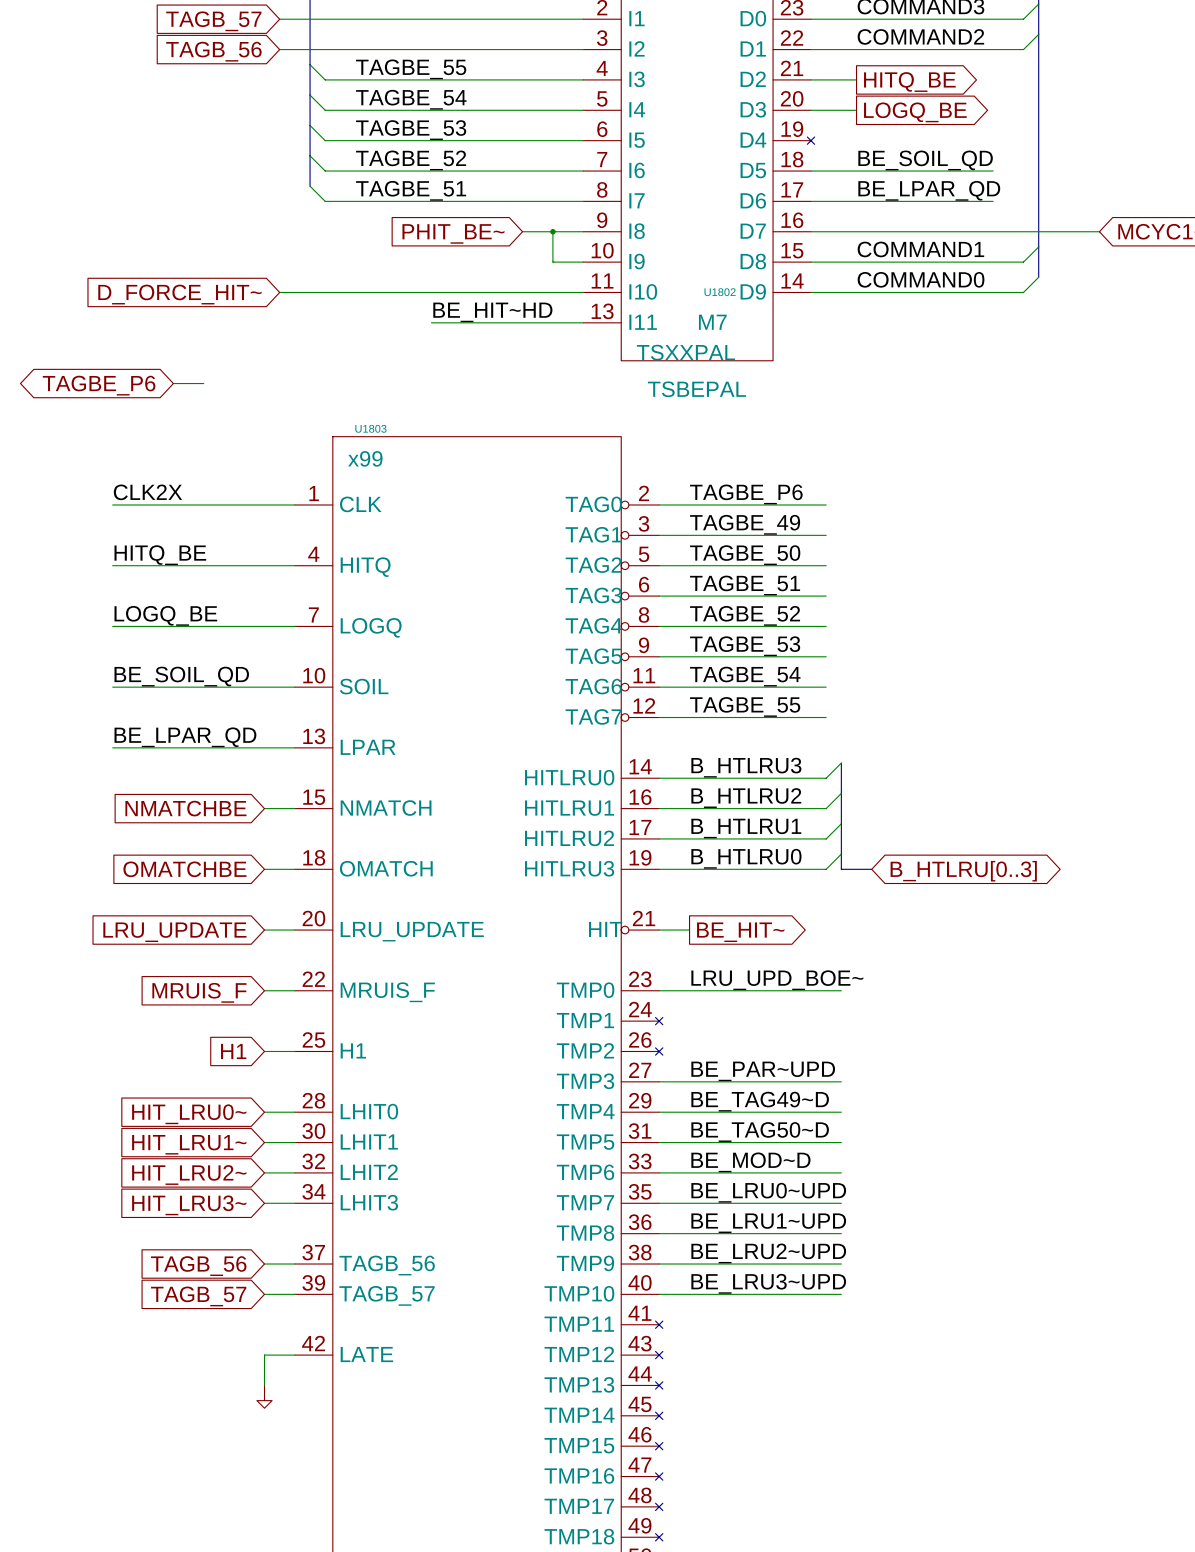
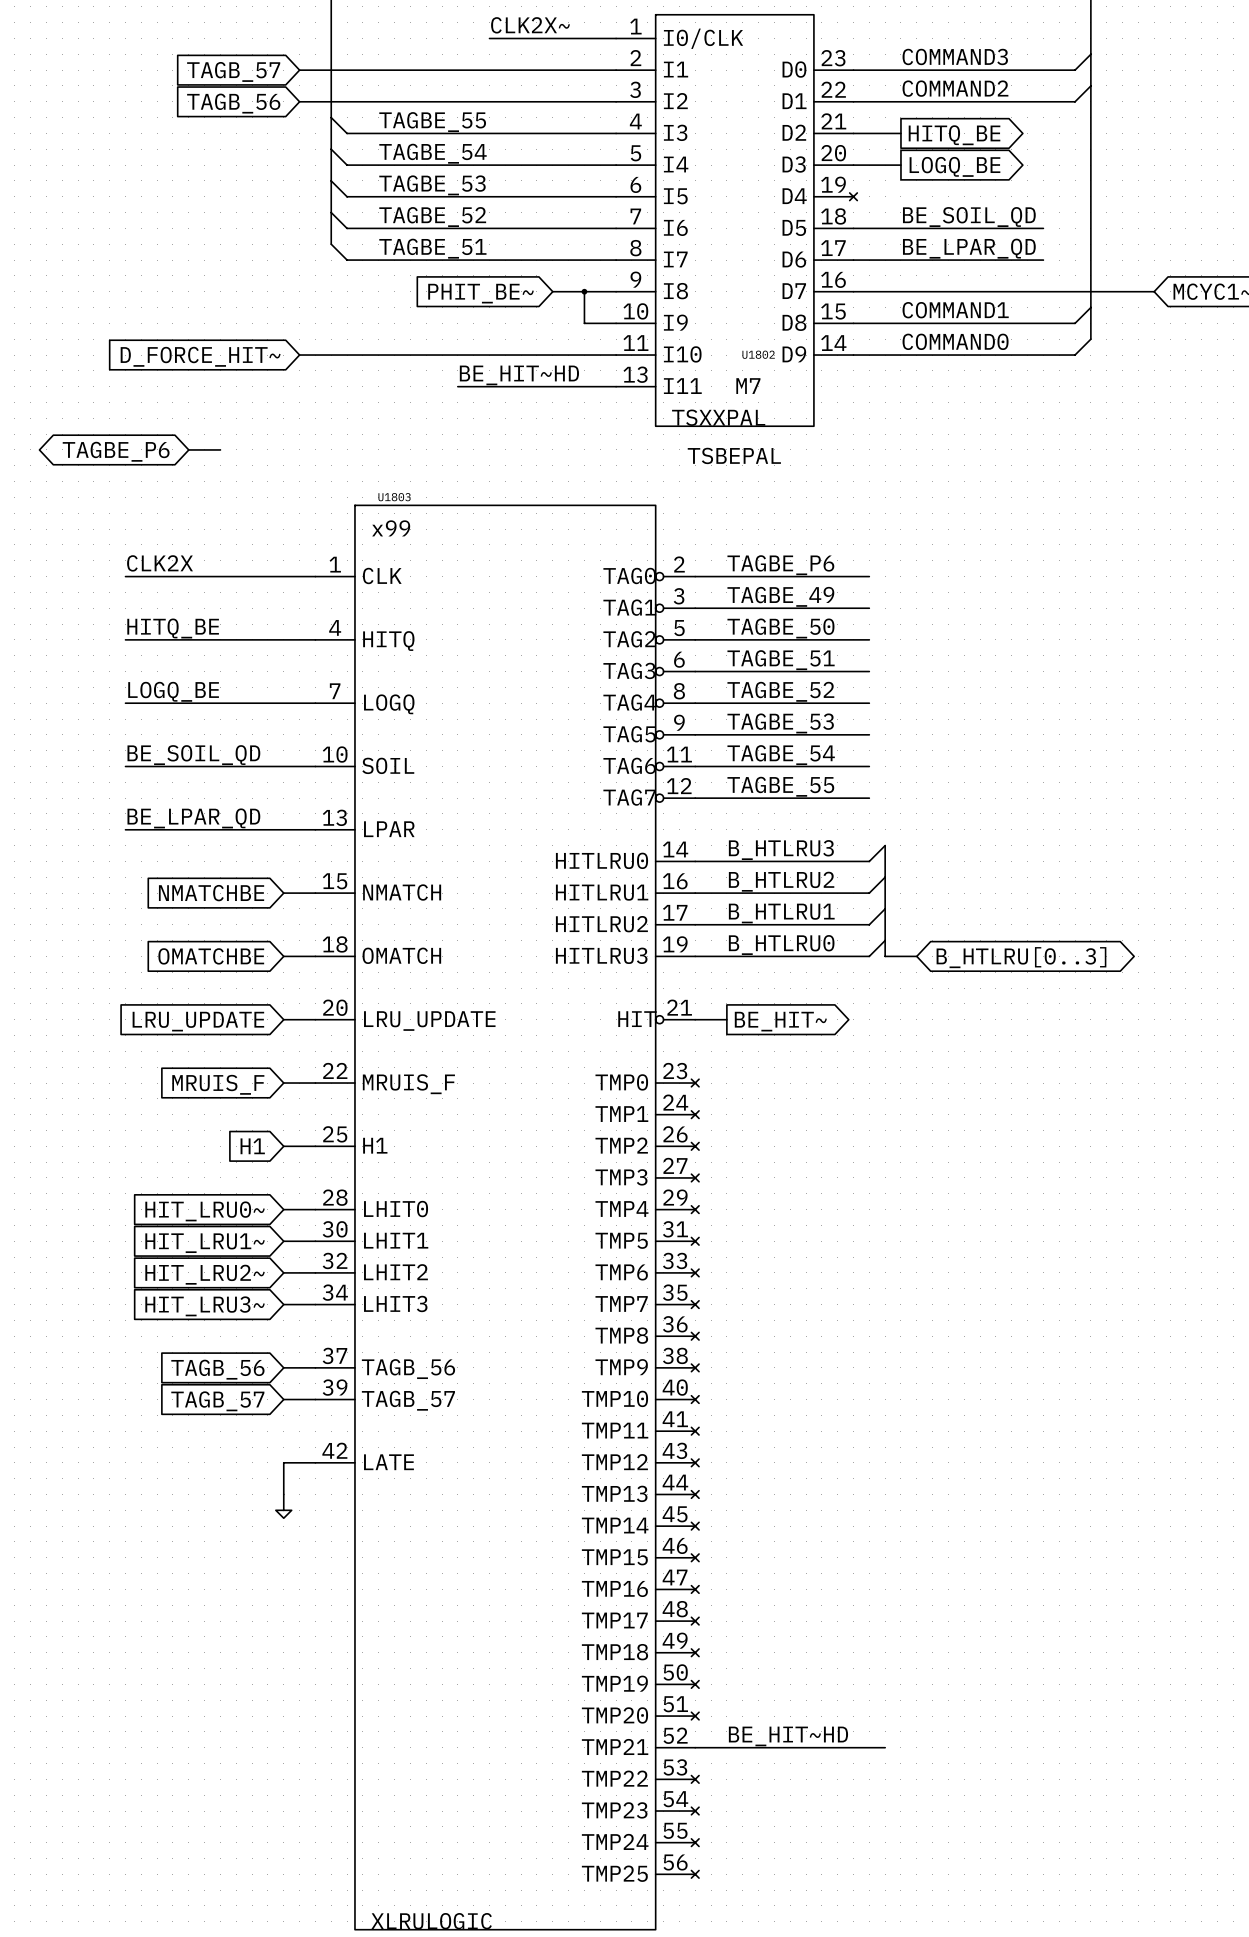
label: LRU_UPD_BOE~ (777, 980) -> none
wire: (659, 990) (841, 990) -> none
no-connect mark: none -> (695, 1083)
label: BE_PAR~UPD (763, 1071) -> none
wire: (659, 1081) (841, 1081) -> none
no-connect mark: none -> (695, 1177)
label: BE_TAG49~D (760, 1101) -> none
wire: (659, 1112) (841, 1112) -> none
no-connect mark: none -> (695, 1209)
label: BE_TAG50~D (760, 1132) -> none
wire: (659, 1142) (841, 1142) -> none
no-connect mark: none -> (695, 1241)
label: BE_MOD~D (750, 1162) -> none
wire: (659, 1172) (841, 1172) -> none
no-connect mark: none -> (695, 1272)
label: BE_LRU0~UPD (768, 1192) -> none
wire: (659, 1203) (841, 1203) -> none
no-connect mark: none -> (695, 1304)
label: BE_LRU1~UPD (768, 1223) -> none
wire: (659, 1233) (841, 1233) -> none
no-connect mark: none -> (695, 1336)
label: BE_LRU2~UPD (768, 1253) -> none
wire: (659, 1264) (841, 1264) -> none
no-connect mark: none -> (695, 1367)
label: BE_LRU3~UPD (768, 1283) -> none
wire: (659, 1294) (841, 1294) -> none
no-connect mark: none -> (695, 1399)

